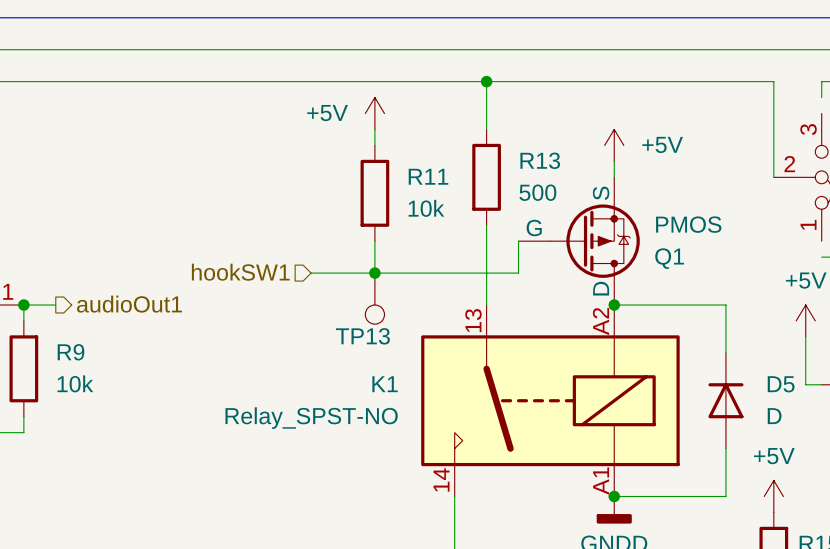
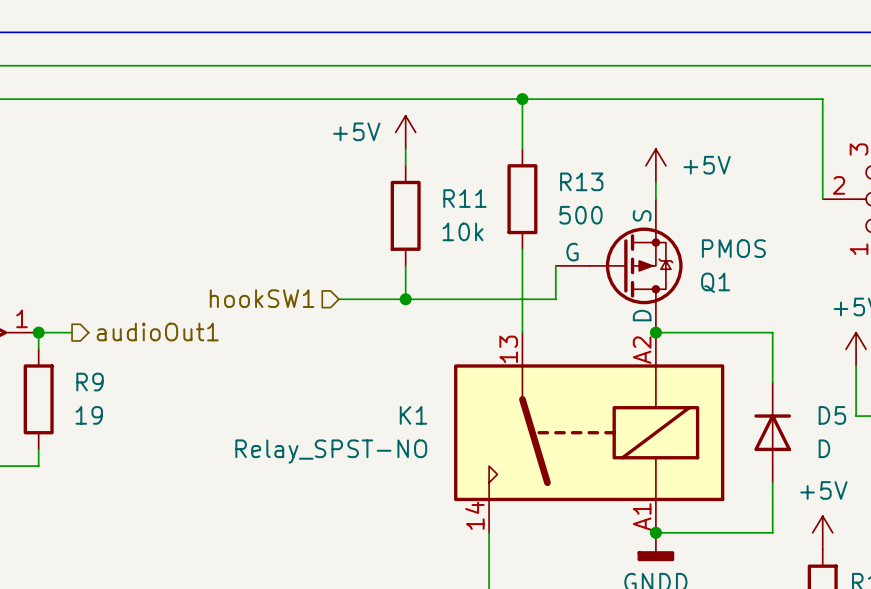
TP13: (374, 298) -> none
R9 value: 10k (75, 383) -> 19 (89, 415)

